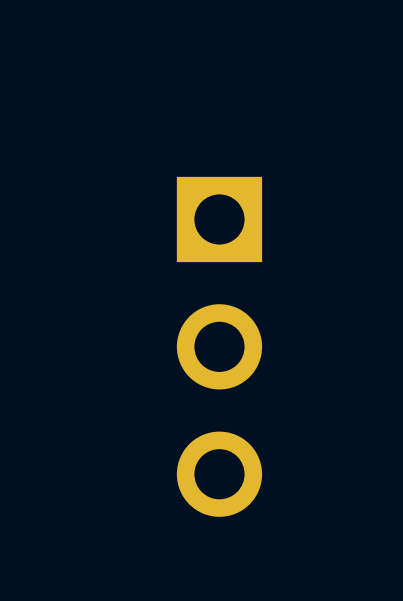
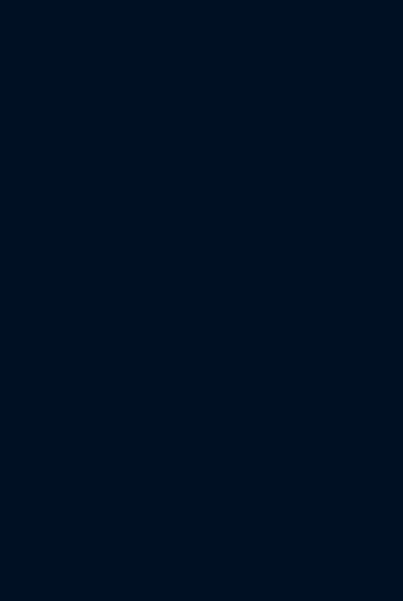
part: (219, 346) -> none

